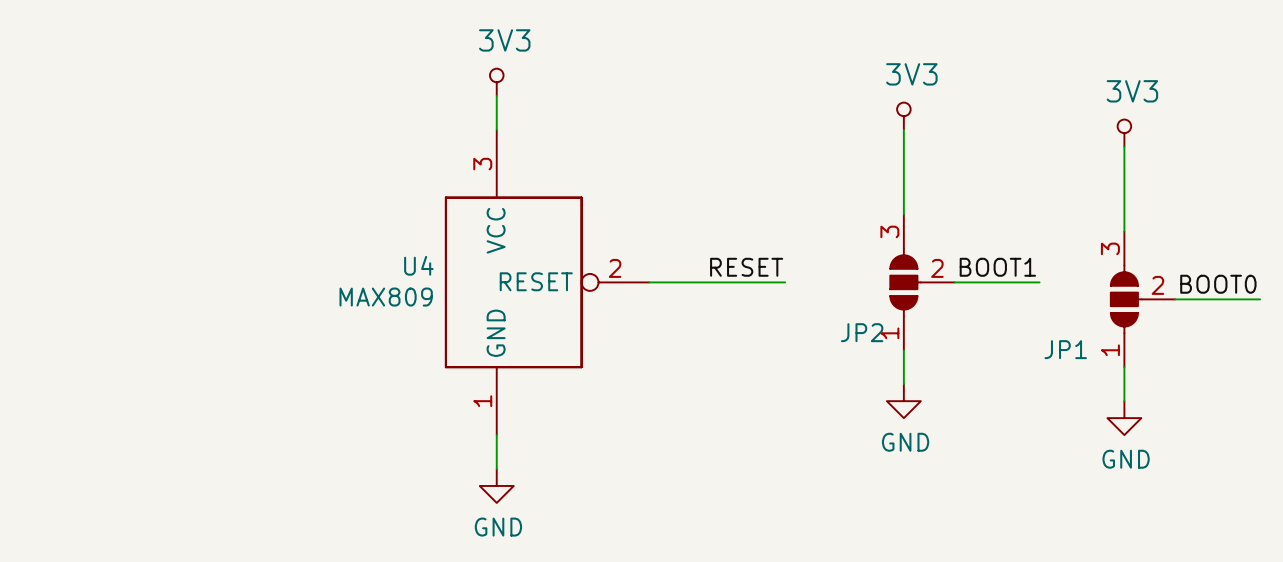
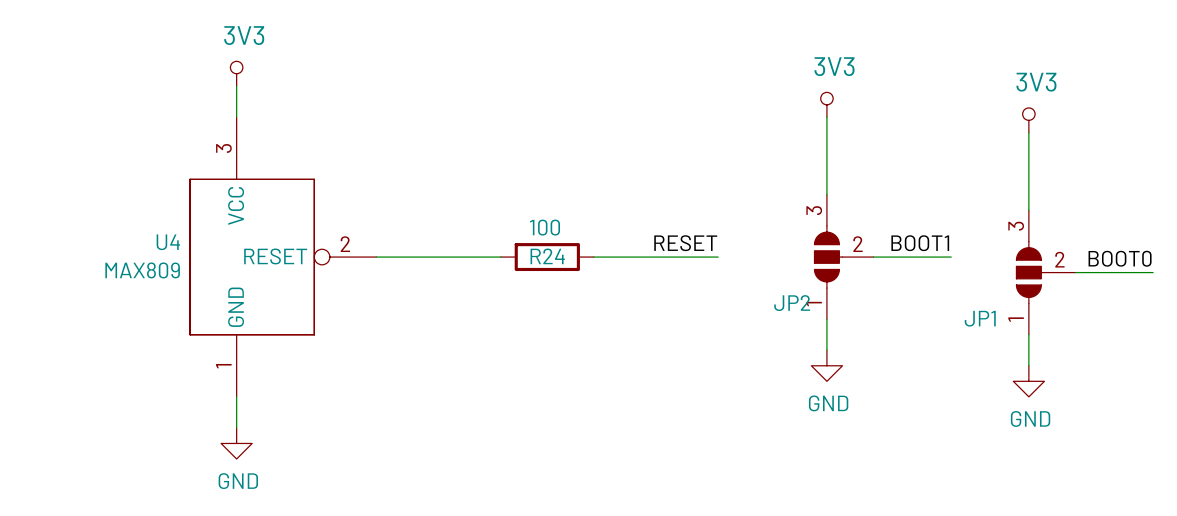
power symbol position: 3V3 (496, 82) -> 3V3 (236, 73)
wire: (496, 95) (496, 129) -> (236, 86) (236, 117)
wire: none -> (376, 257) (500, 257)
U4 position: (547, 282) -> (283, 257)
R24: none -> 100 (547, 257)
wire: (496, 435) (496, 469) -> (236, 396) (236, 427)
power symbol position: GND (496, 485) -> GND (236, 443)

